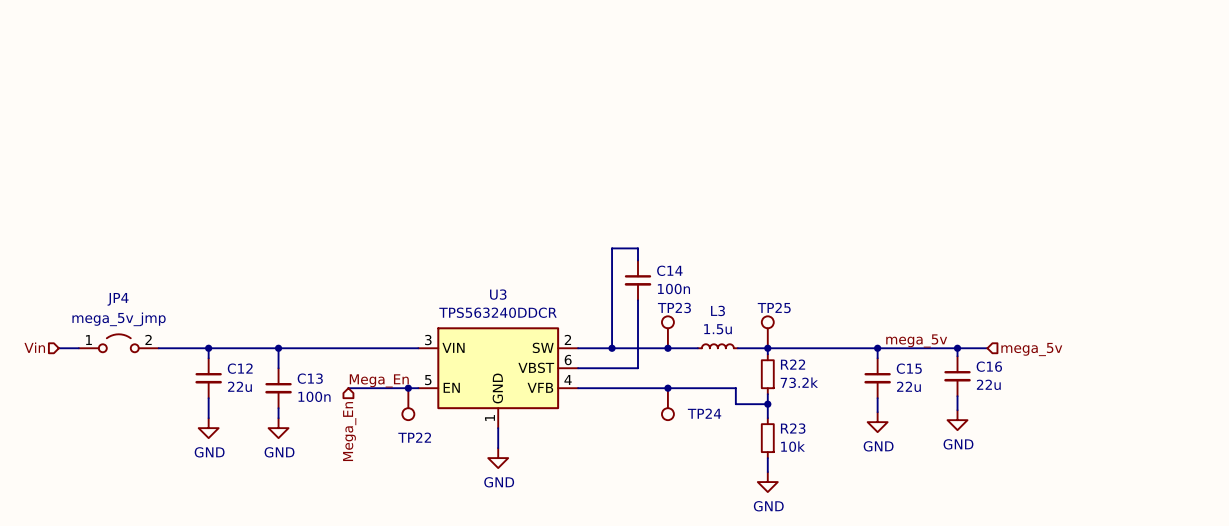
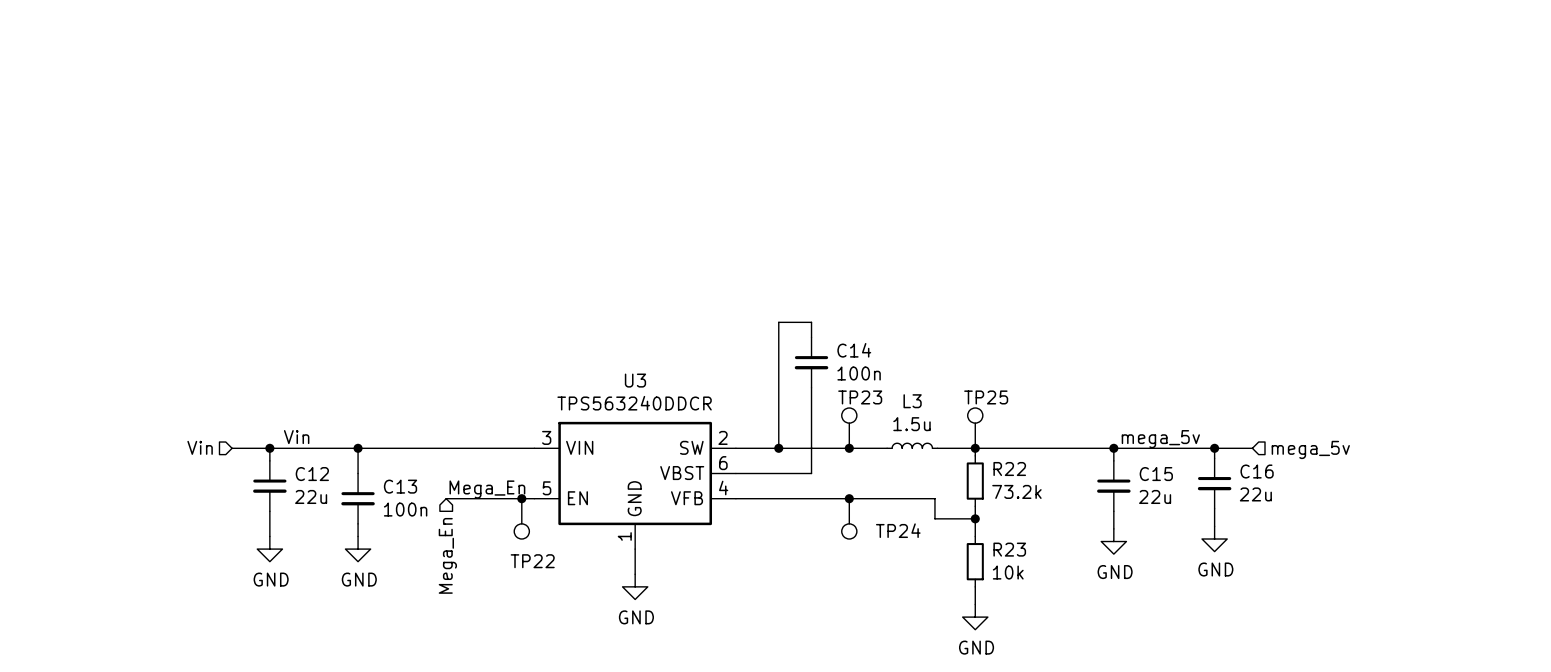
label: none -> Vin (296, 437)
JP4: mega_5v_jmp (118, 343) -> none
hierarchical label position: Vin (34, 347) -> Vin (200, 447)
wire: (58, 348) (78, 348) -> none
wire: (158, 348) (178, 348) -> none

